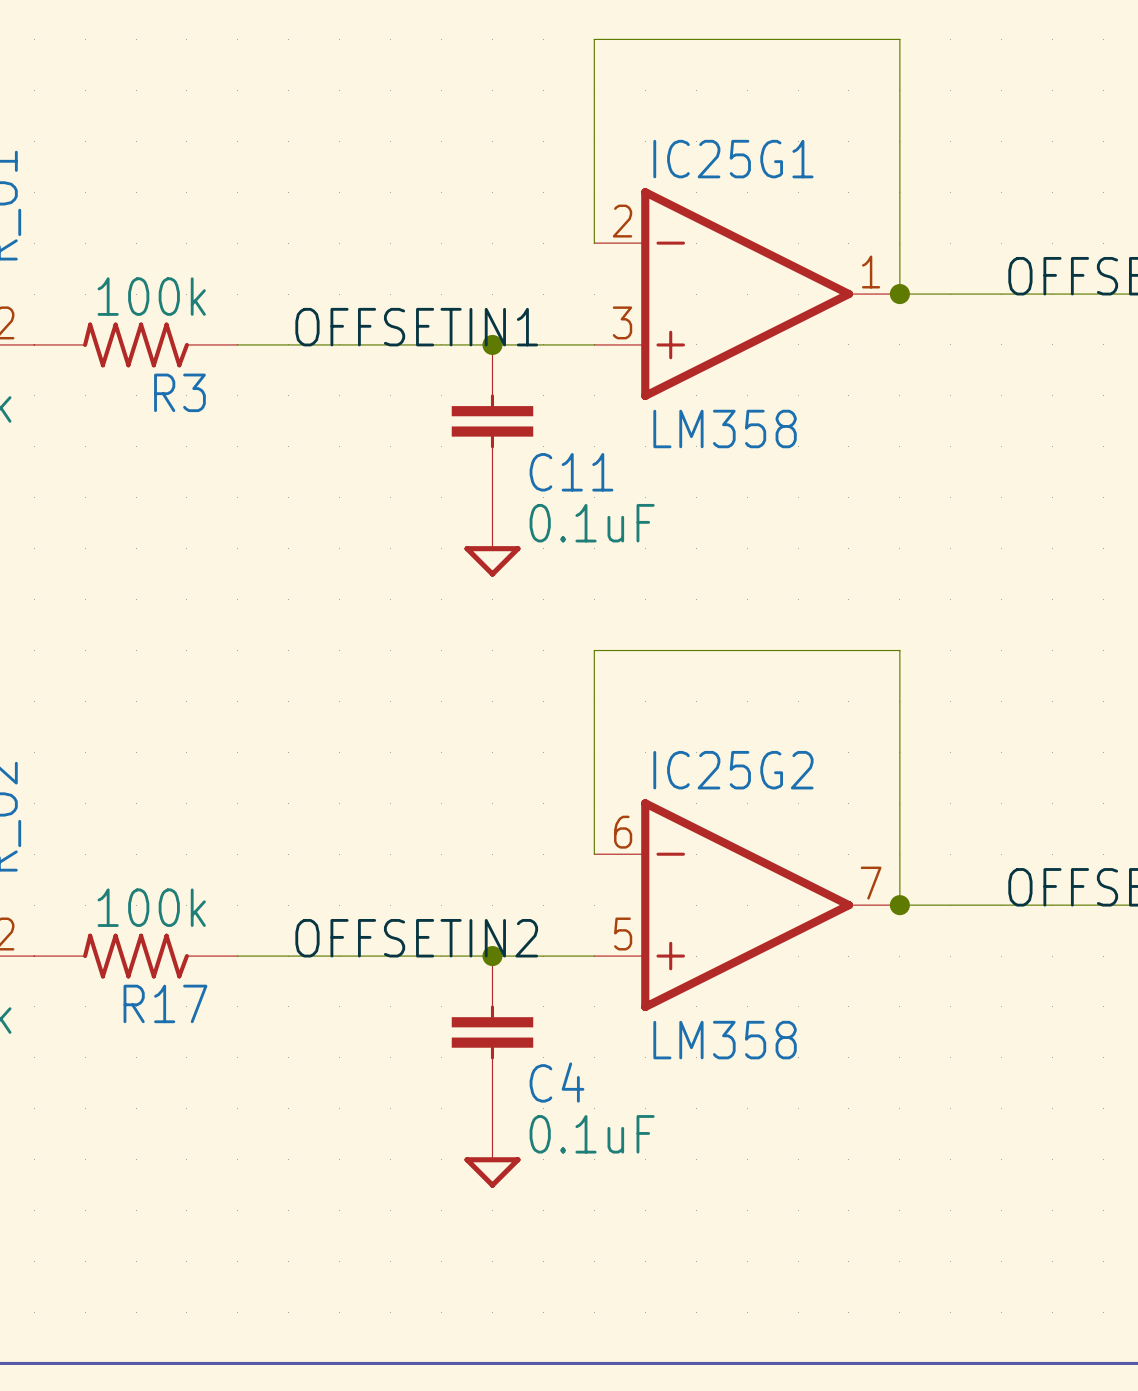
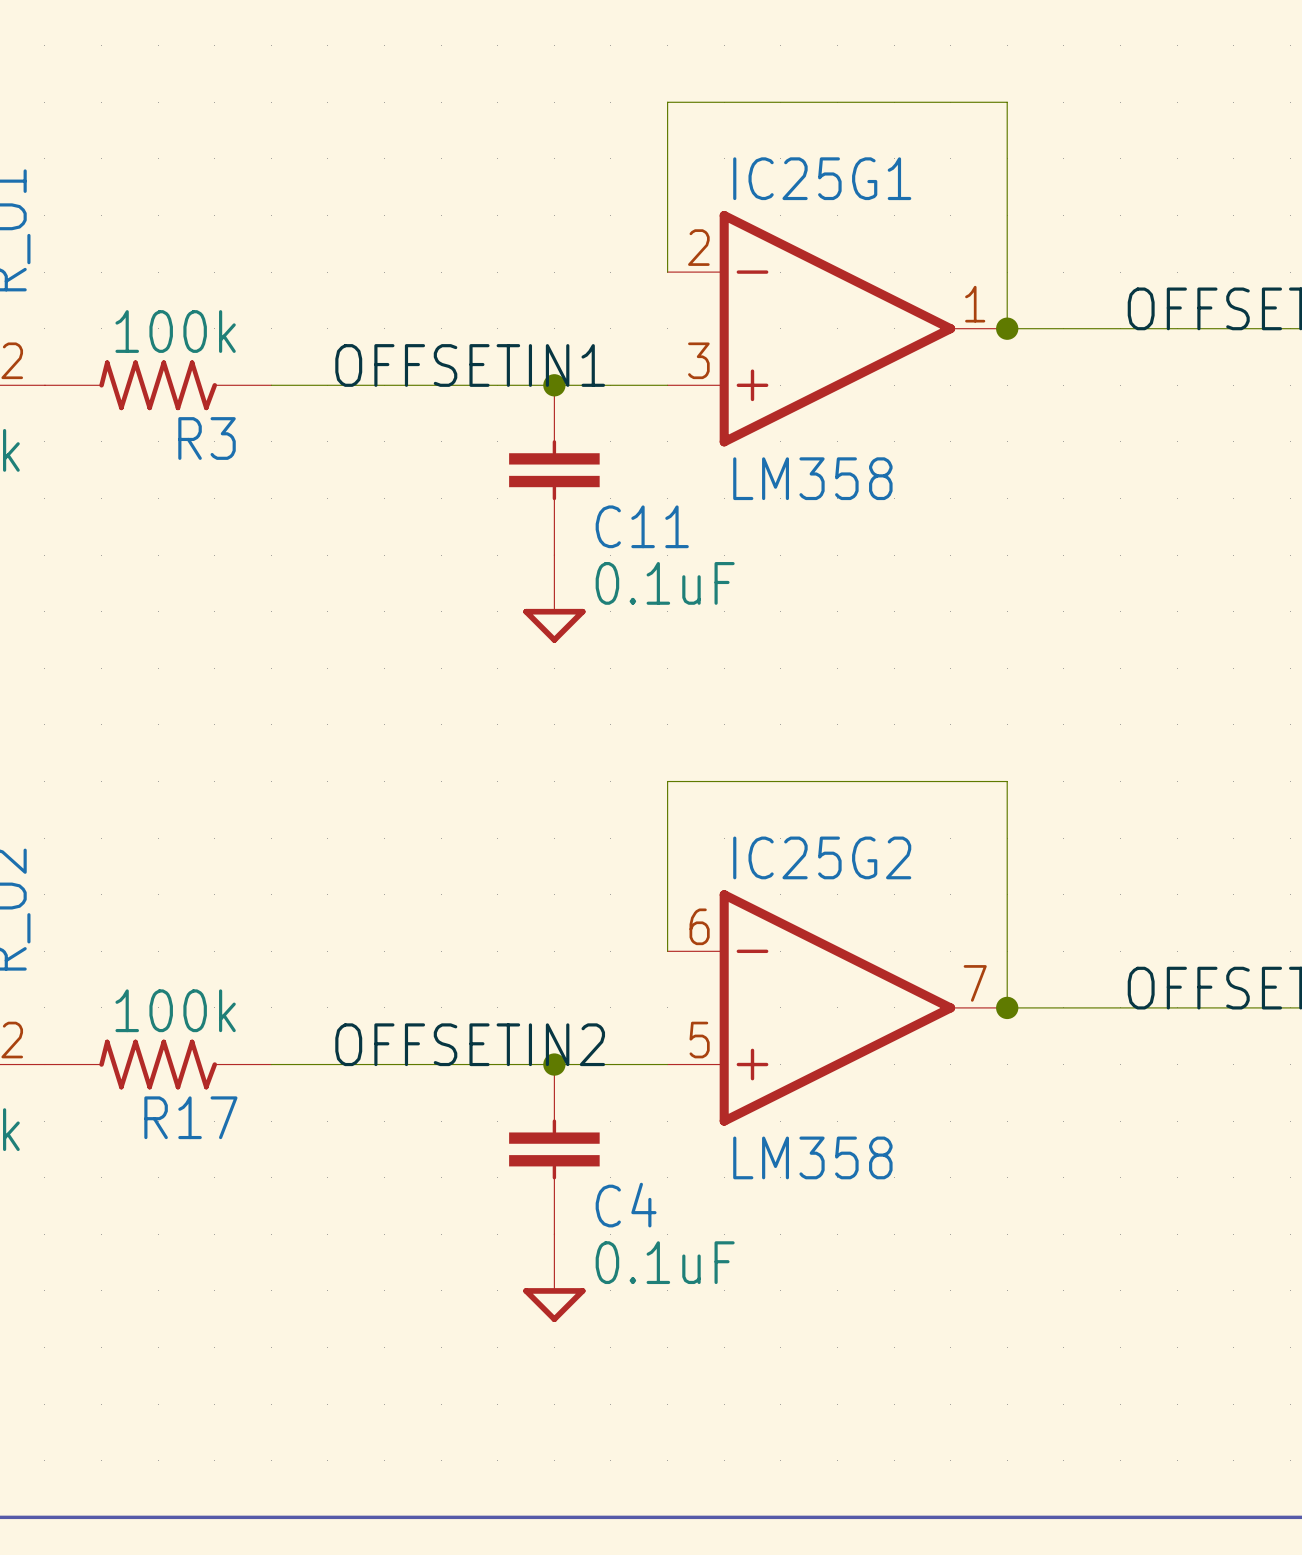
wire: (594, 90) (594, 39) (899, 39) (899, 90) -> (667, 102) (1007, 102)
wire: (594, 701) (594, 650) (899, 650) (899, 701) -> (667, 781) (1007, 781)

